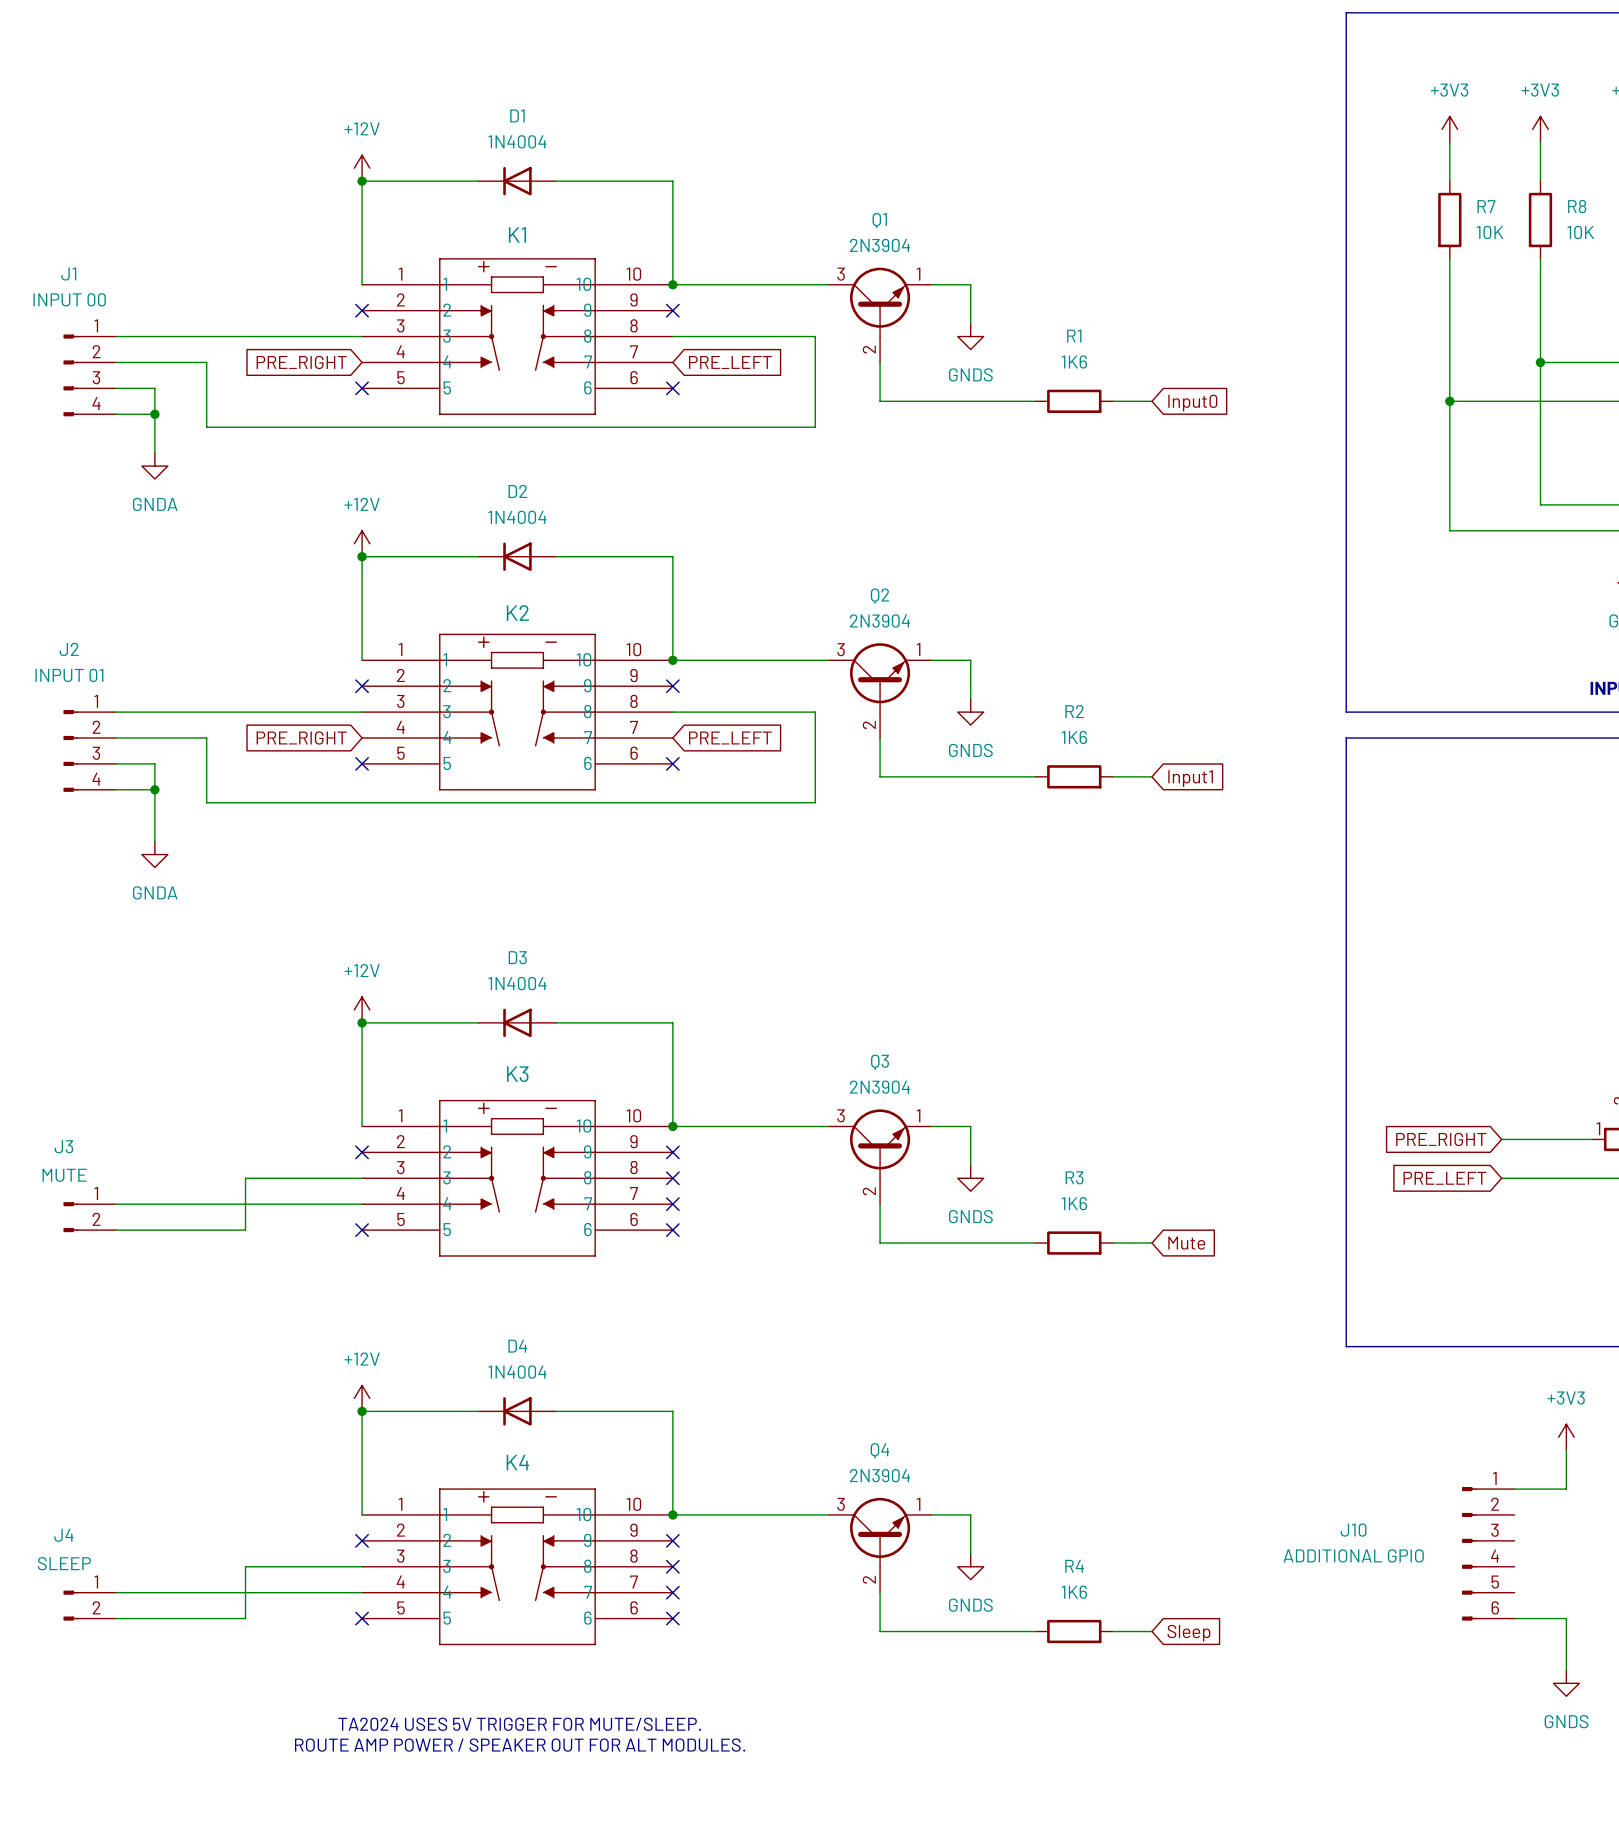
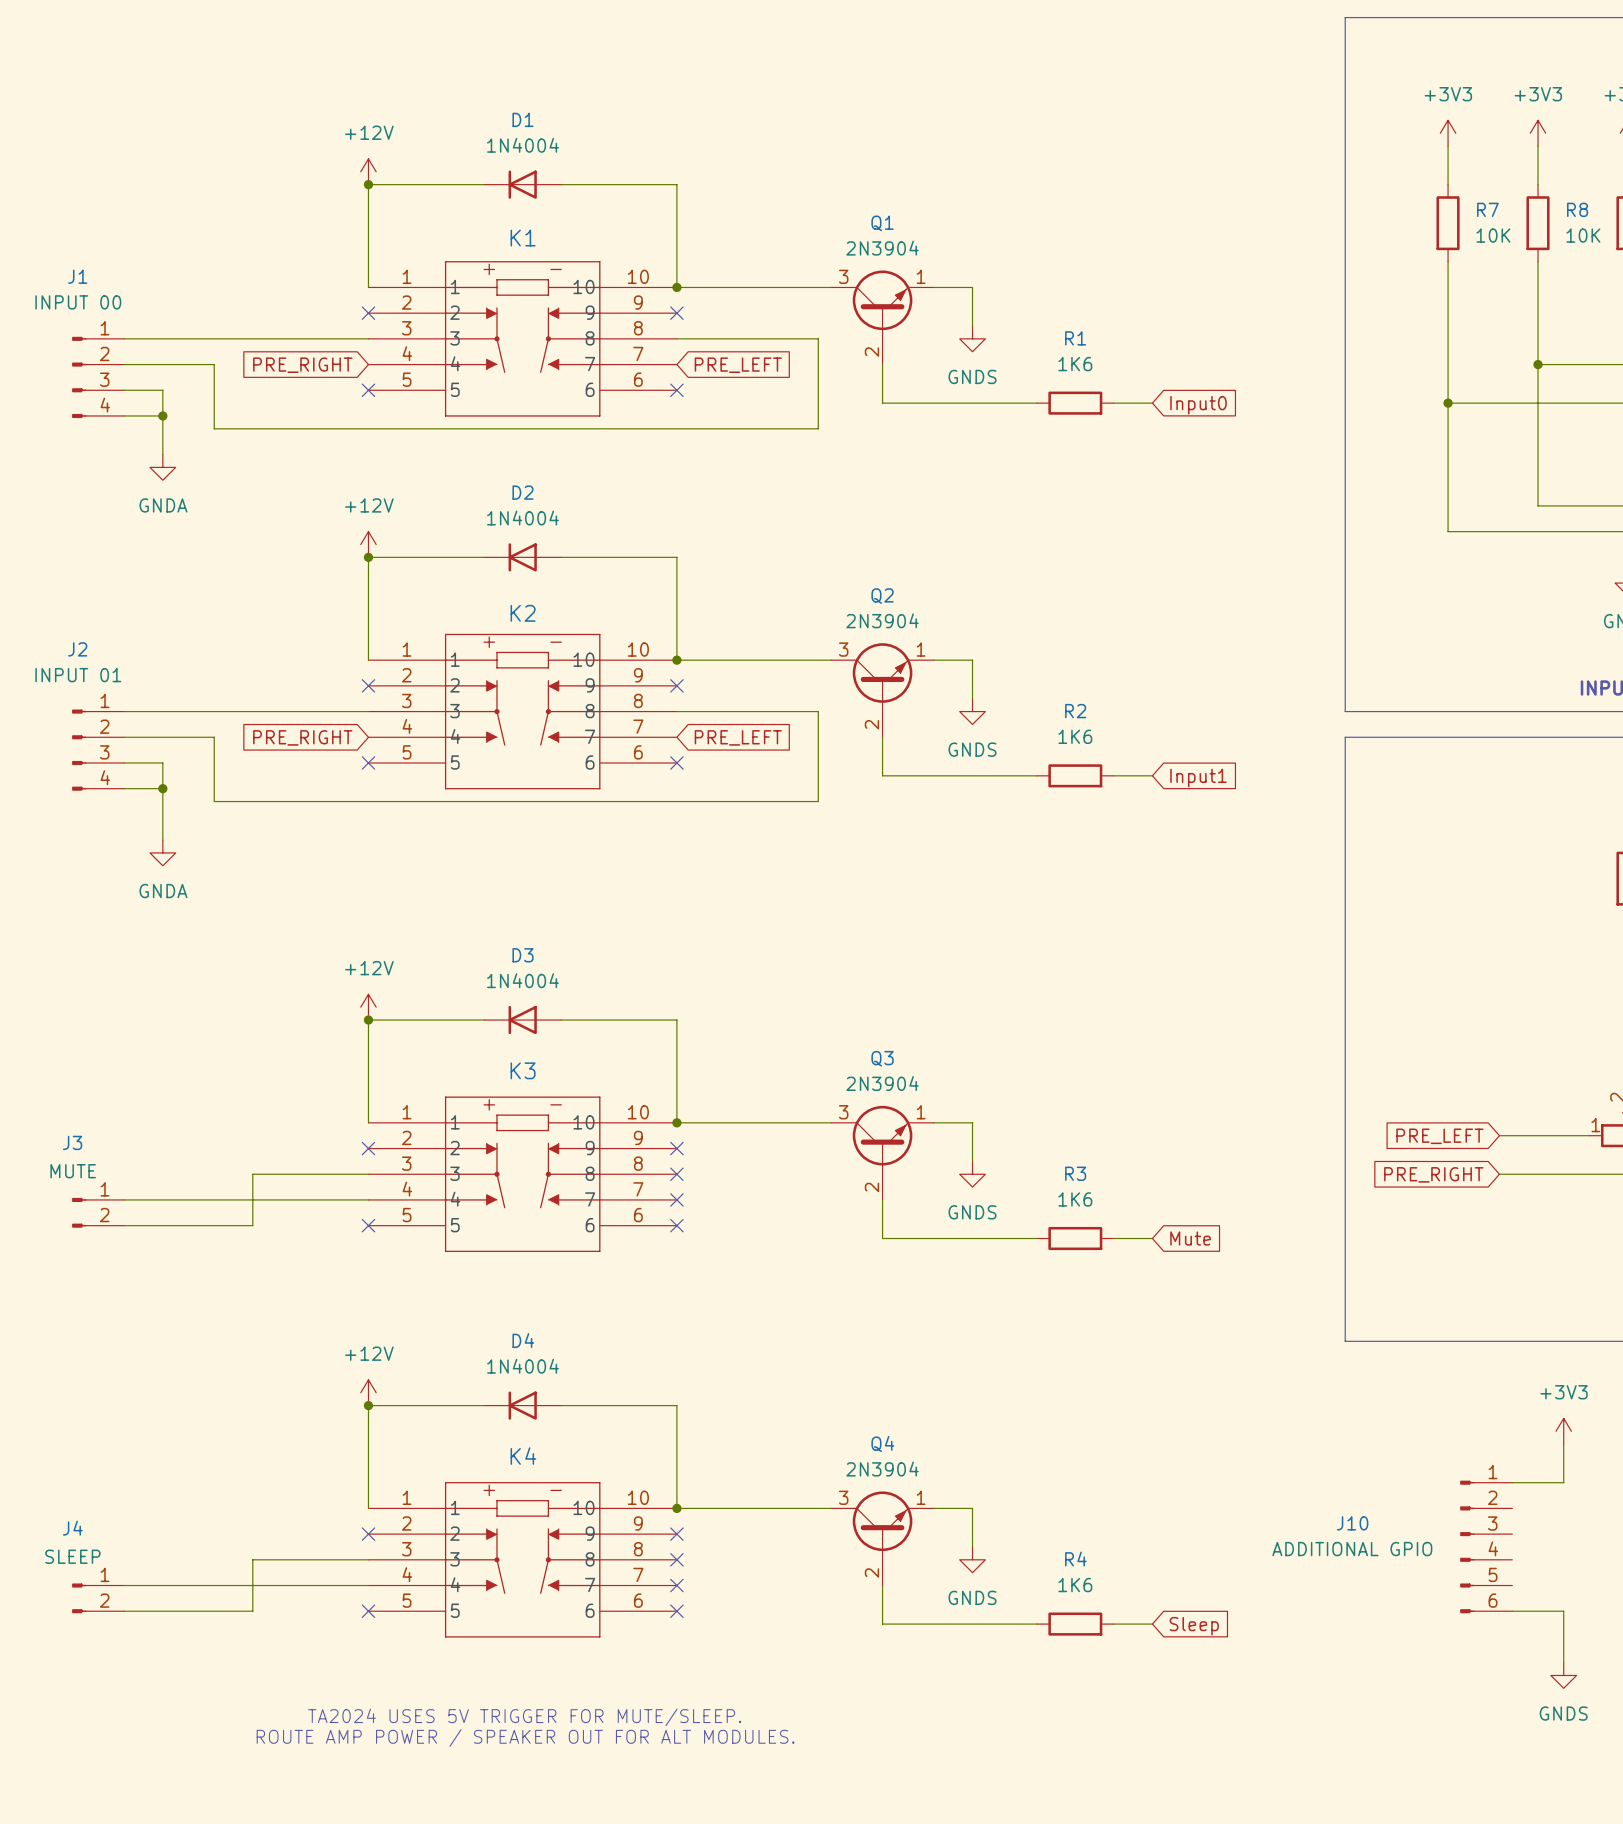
global label: PRE_RIGHT (1441, 1139) -> PRE_LEFT (1439, 1136)
global label: PRE_LEFT (1444, 1178) -> PRE_RIGHT (1433, 1174)

